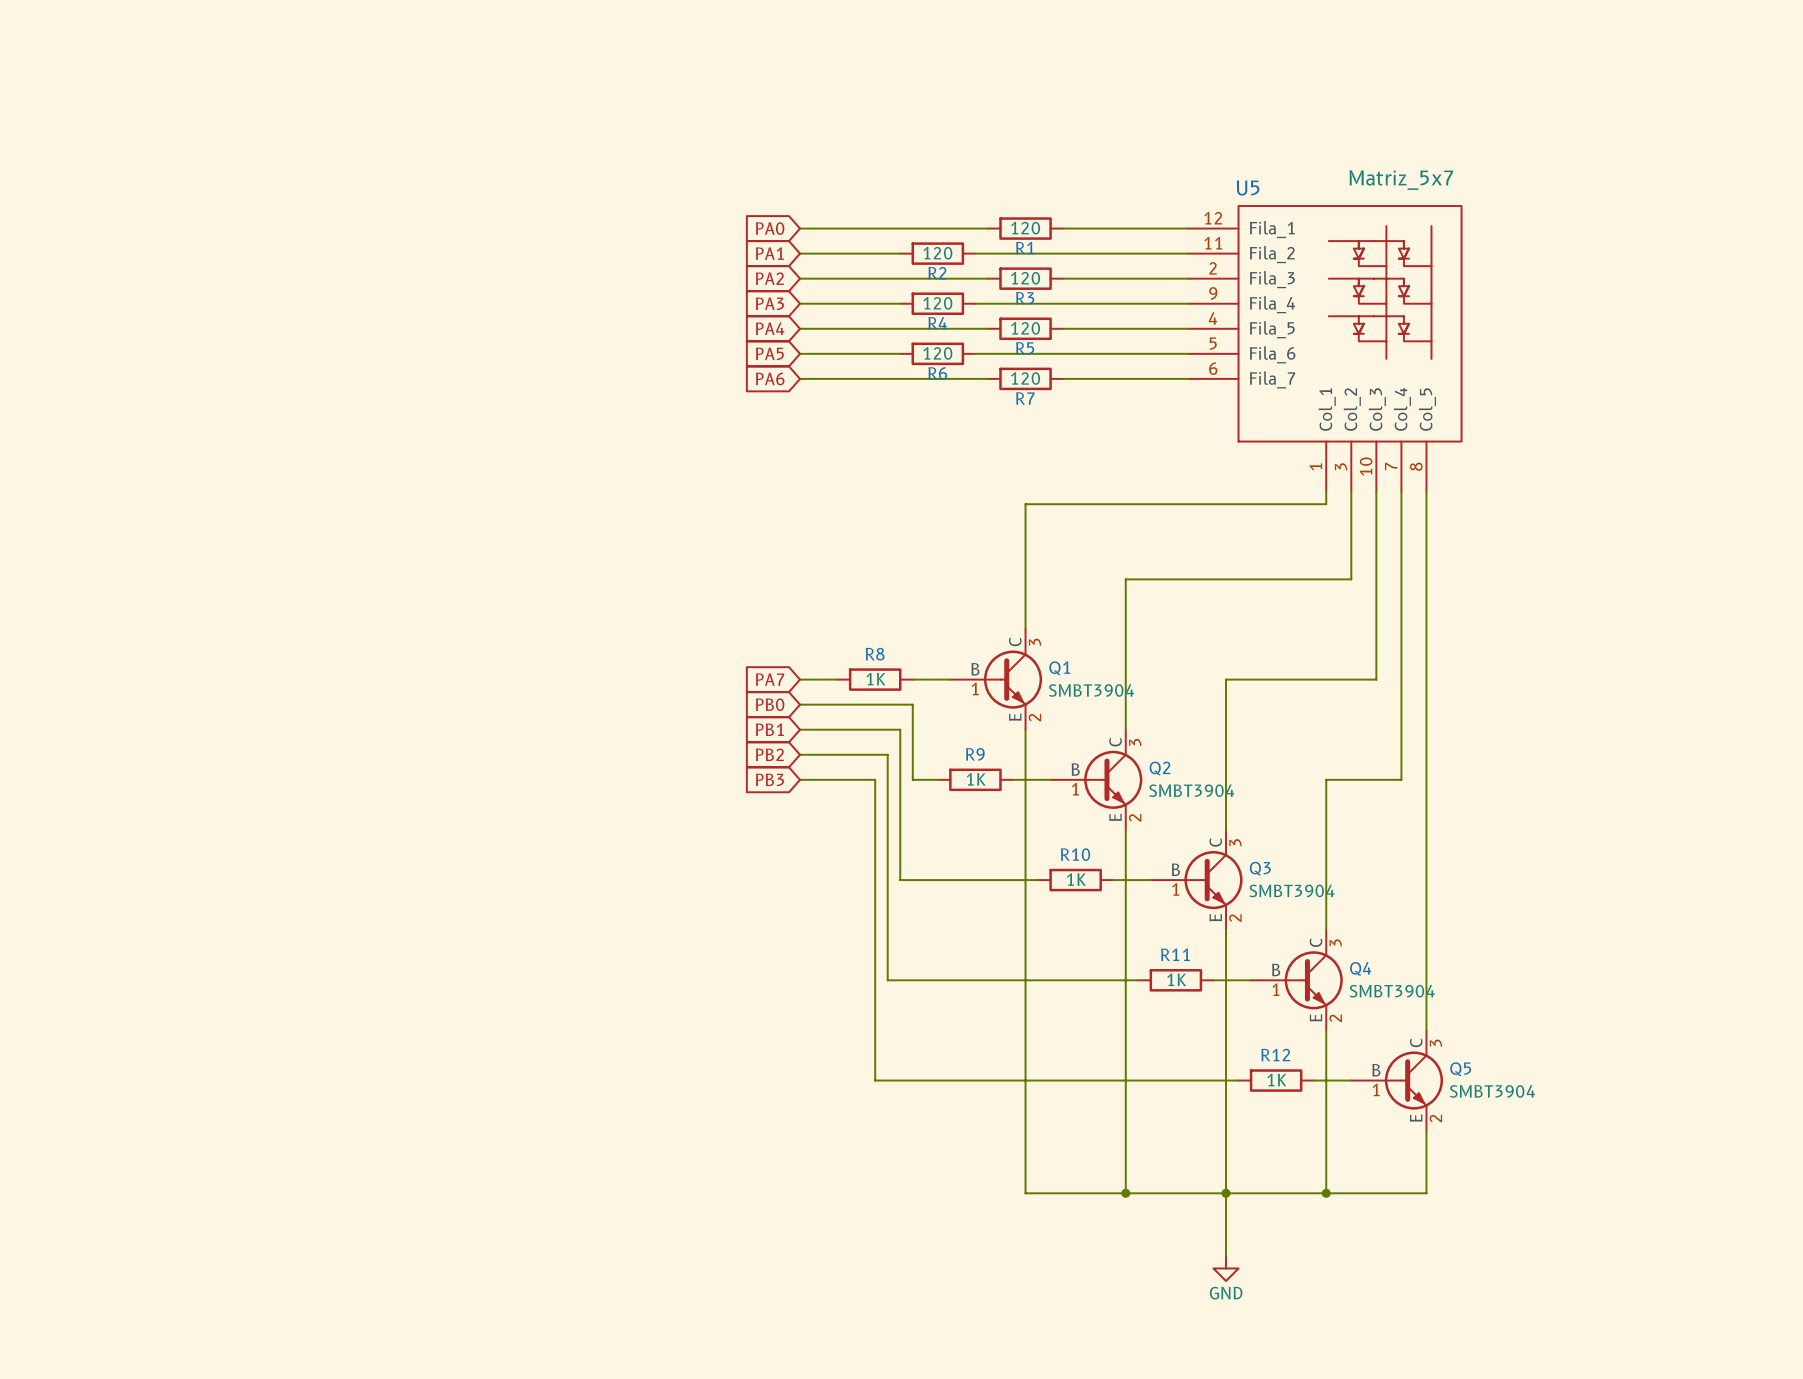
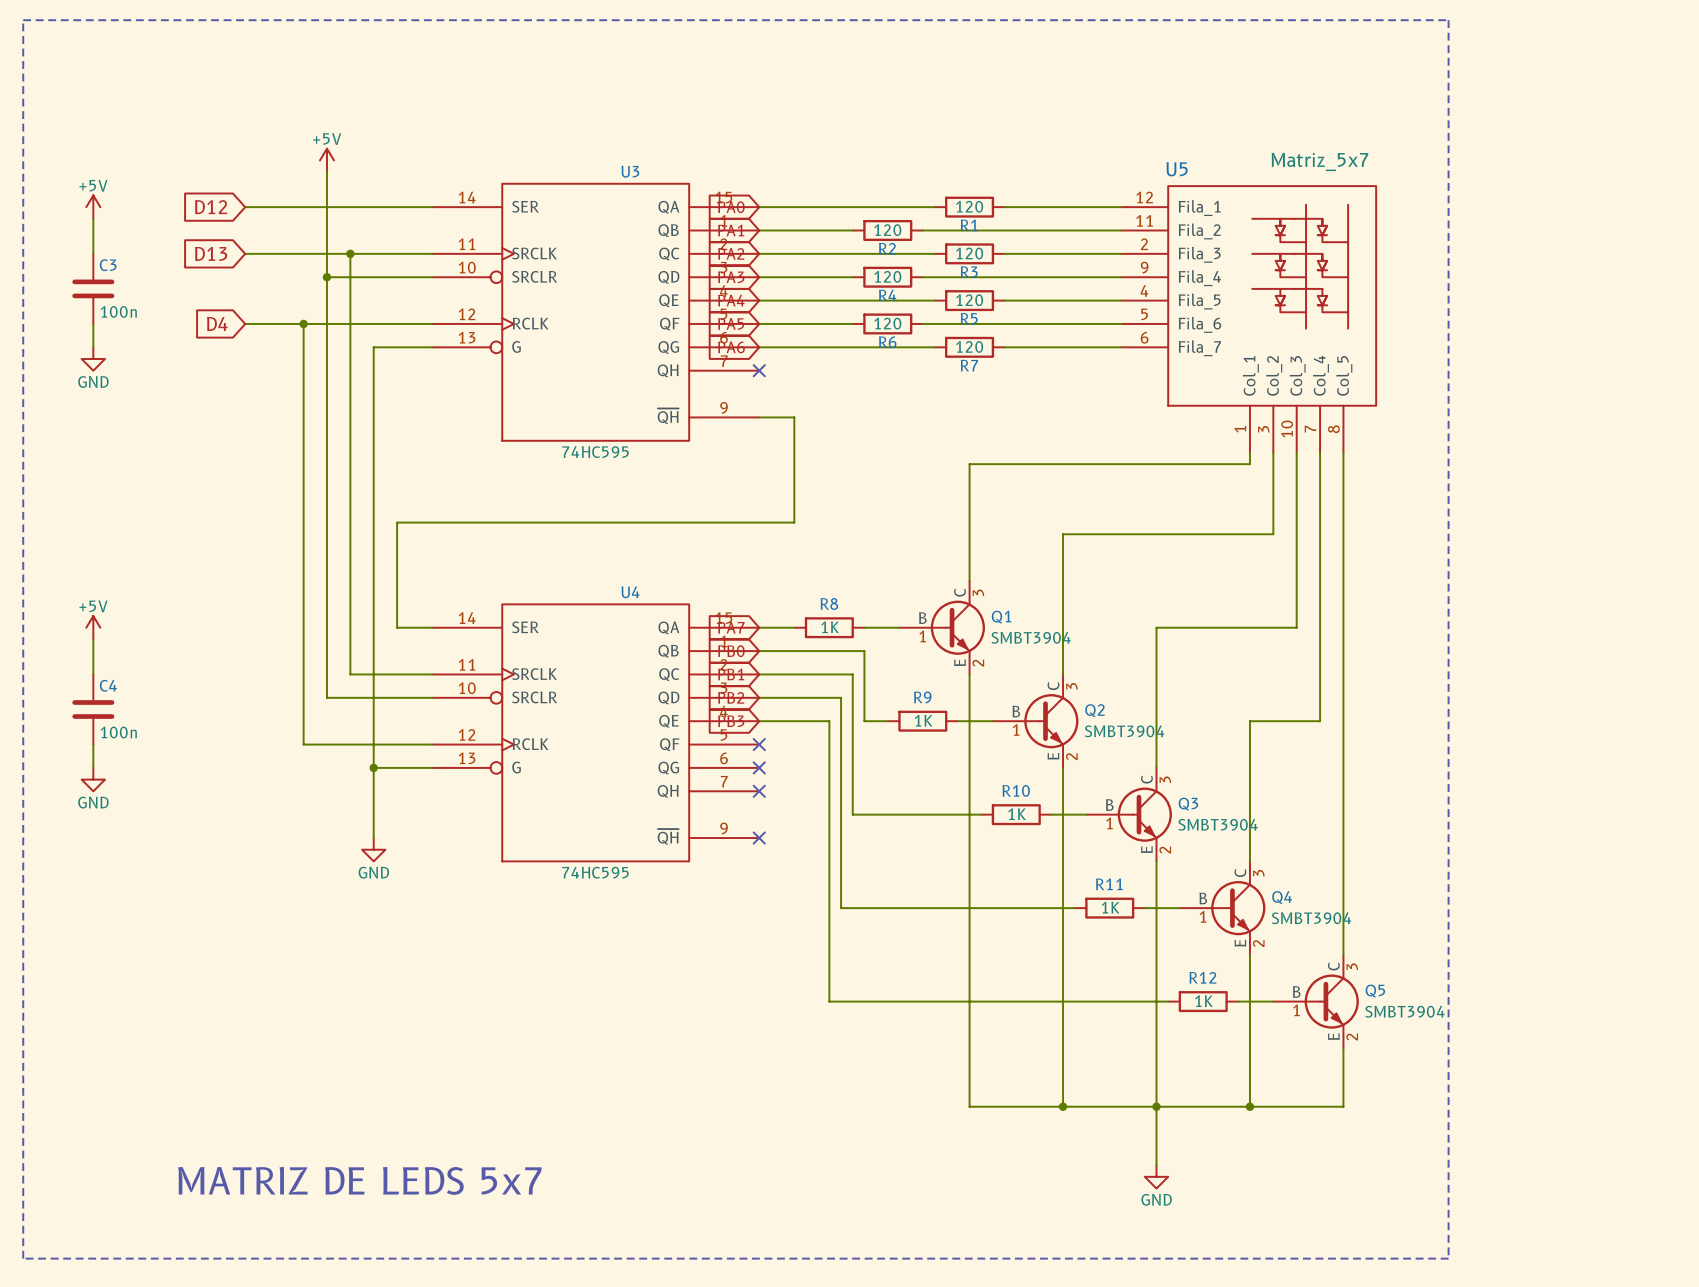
line: none -> (23, 20) (1448, 20) (1448, 1258) (23, 1258) (23, 20)
power symbol: none -> +5V (326, 160)
wire: none -> (326, 172) (326, 697) (432, 697)
power symbol: none -> +5V (93, 207)
global label: none -> D12 (211, 207)
wire: none -> (245, 207) (432, 207)
wire: none -> (93, 218) (93, 253)
global label: none -> D13 (211, 253)
wire: none -> (245, 253) (432, 253)
wire: none -> (350, 253) (350, 674) (432, 674)
junction: none -> (350, 253)
wire: none -> (326, 277) (432, 277)
junction: none -> (326, 277)
C3: none -> 100n (93, 288)
U3: none -> 74HC595 (595, 312)
wire: none -> (93, 323) (93, 347)
global label: none -> D4 (217, 323)
wire: none -> (245, 323) (432, 323)
wire: none -> (303, 323) (303, 744) (432, 744)
junction: none -> (303, 323)
wire: none -> (432, 347) (373, 347) (373, 838)
power symbol: none -> GND (93, 359)
no-connect mark: none -> (759, 370)
wire: none -> (759, 417) (794, 417) (794, 522) (397, 522) (397, 627) (432, 627)
power symbol: none -> +5V (93, 627)
wire: none -> (93, 639) (93, 674)
C4: none -> 100n (93, 709)
U4: none -> 74HC595 (595, 732)
wire: none -> (93, 744) (93, 767)
no-connect mark: none -> (759, 744)
wire: none -> (373, 767) (432, 767)
junction: none -> (373, 767)
no-connect mark: none -> (759, 767)
power symbol: none -> GND (93, 779)
no-connect mark: none -> (759, 791)
no-connect mark: none -> (759, 838)
power symbol: none -> GND (373, 849)
text: none -> MATRIZ DE LEDS 5x7 (359, 1180)

